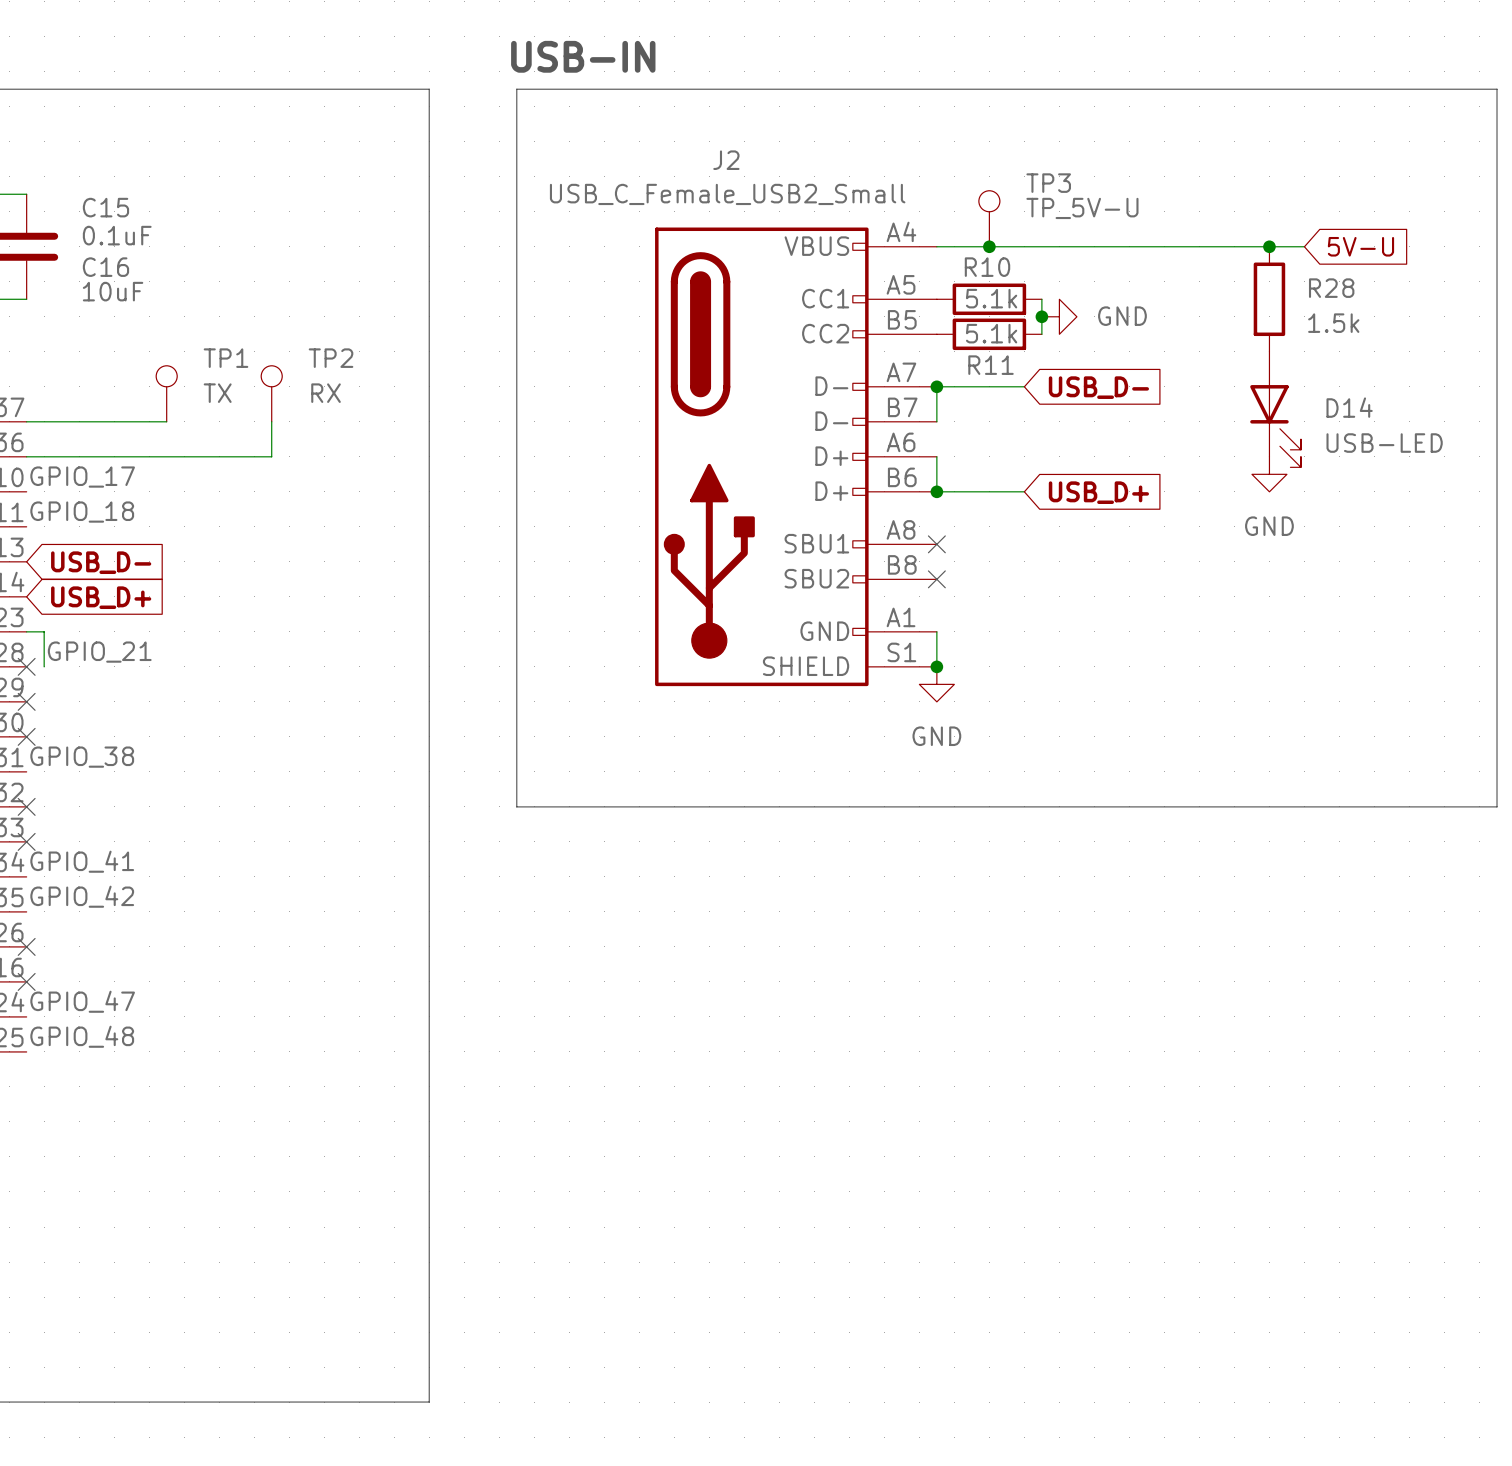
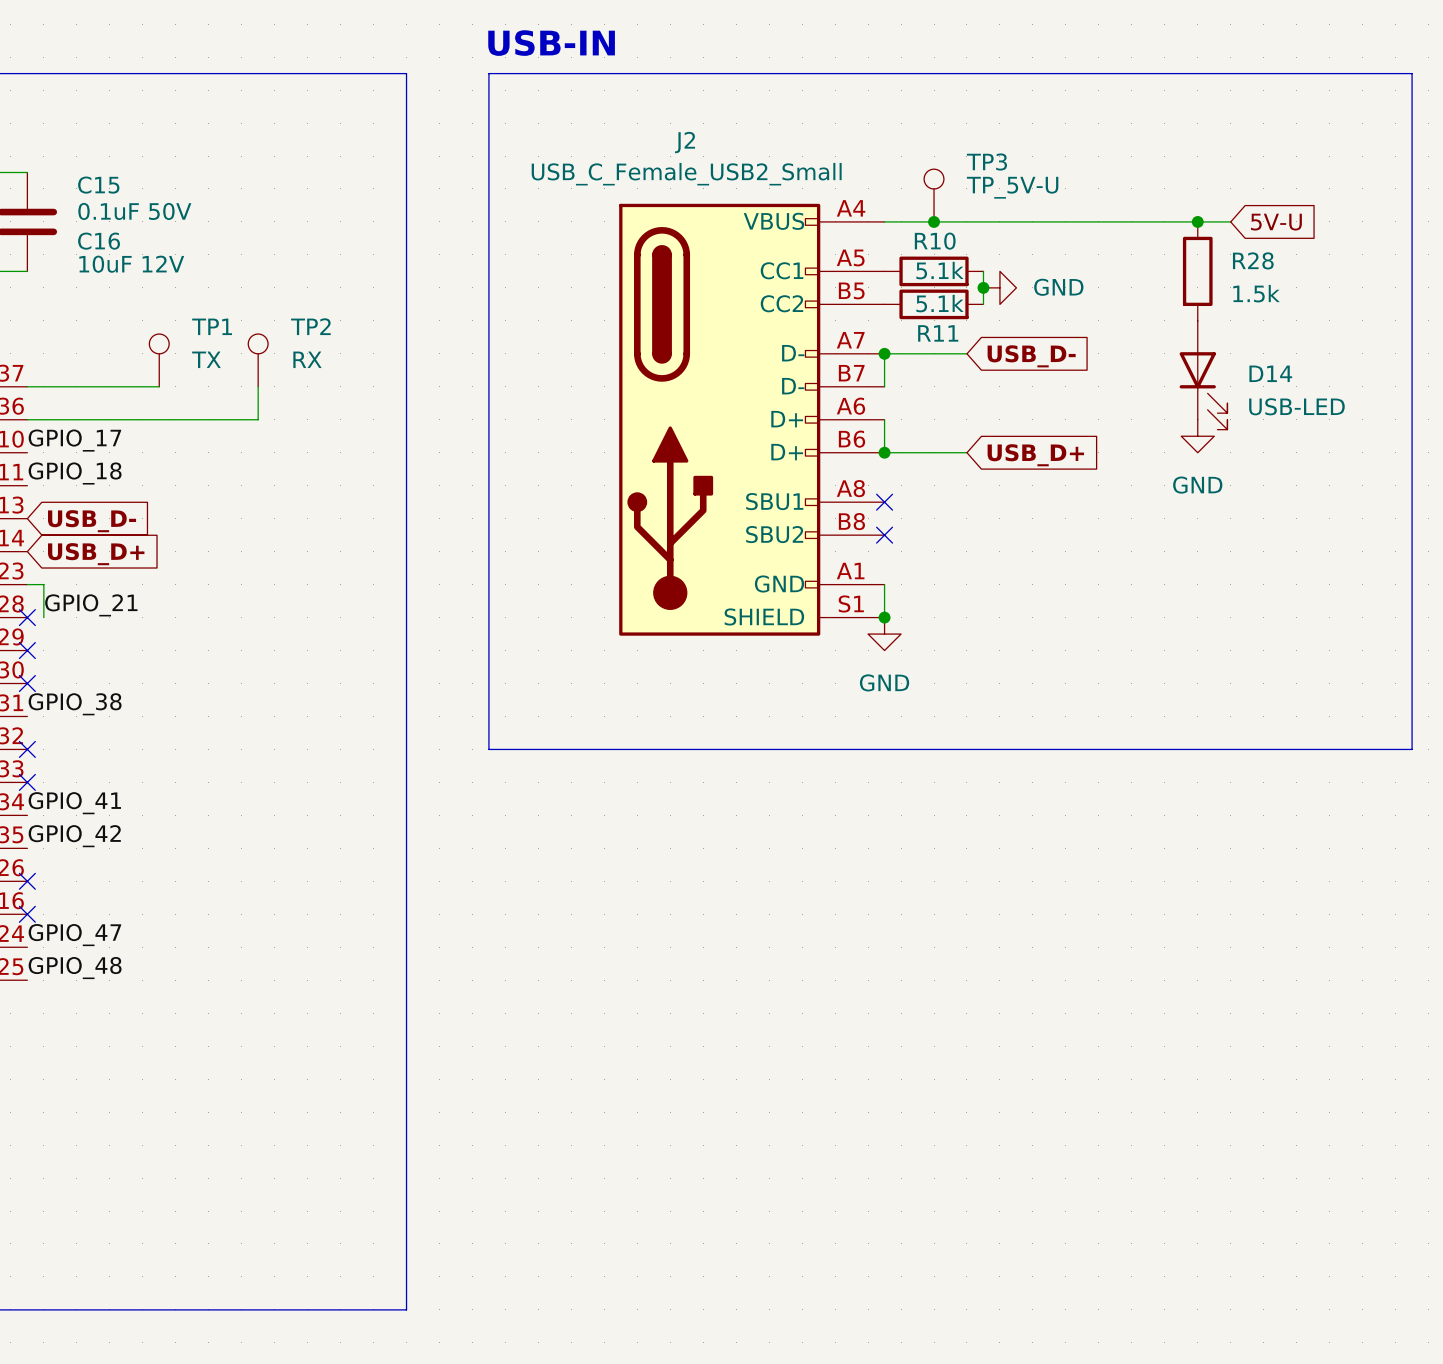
C15 value: 0.1uF (117, 235) -> 0.1uF 50V (134, 211)
C16 value: 10uF (113, 291) -> 10uF 12V (131, 264)

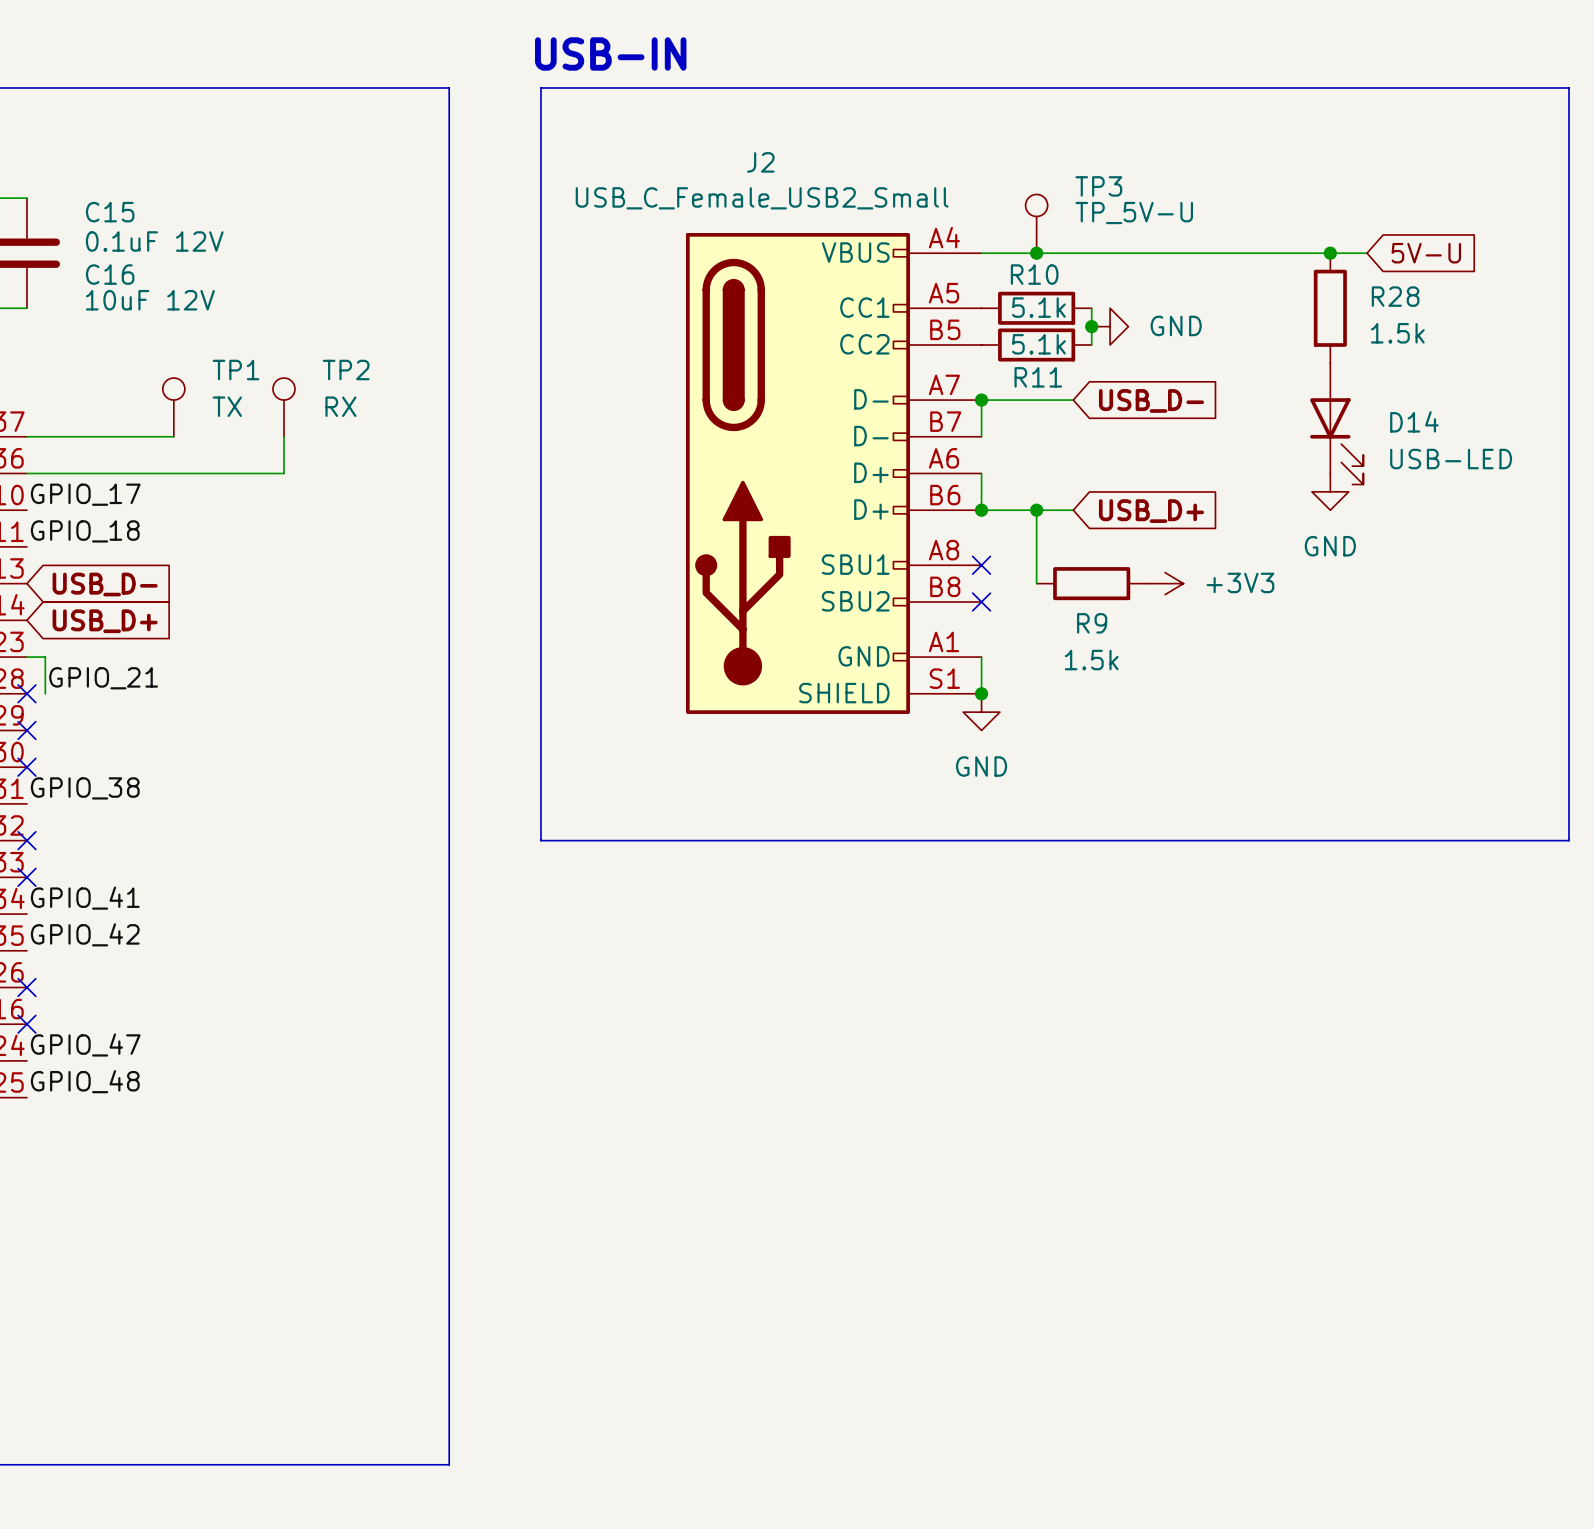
C15 value: 0.1uF 50V (134, 211) -> 0.1uF 12V (154, 241)
wire: none -> (1036, 510) (1036, 583)
junction: none -> (1036, 510)
R9: none -> 1.5k (1091, 583)
power symbol: none -> +3V3 (1165, 583)

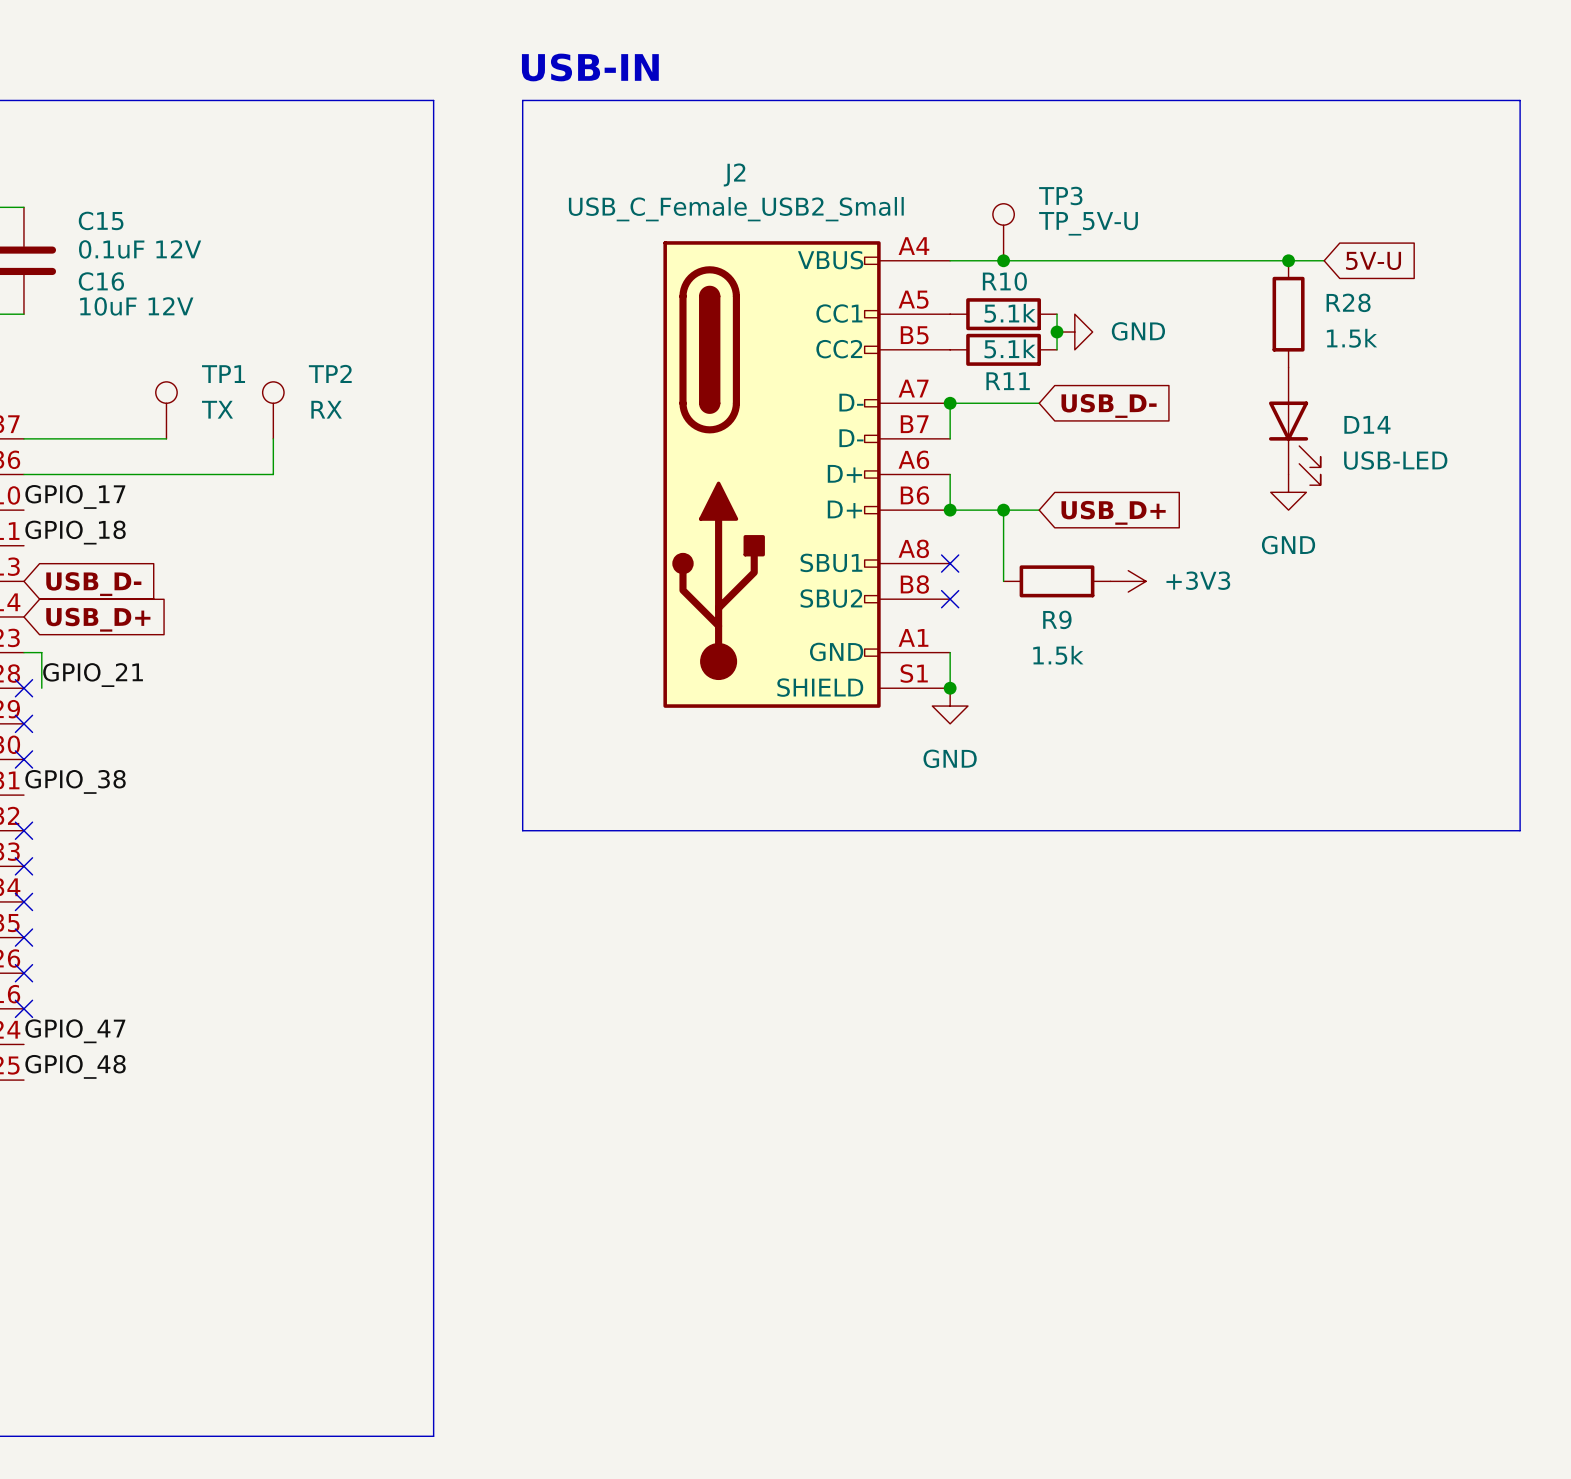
label: GPIO_41 (85, 898) -> none
no-connect mark: none -> (23, 901)
label: GPIO_42 (85, 934) -> none
no-connect mark: none -> (23, 937)

